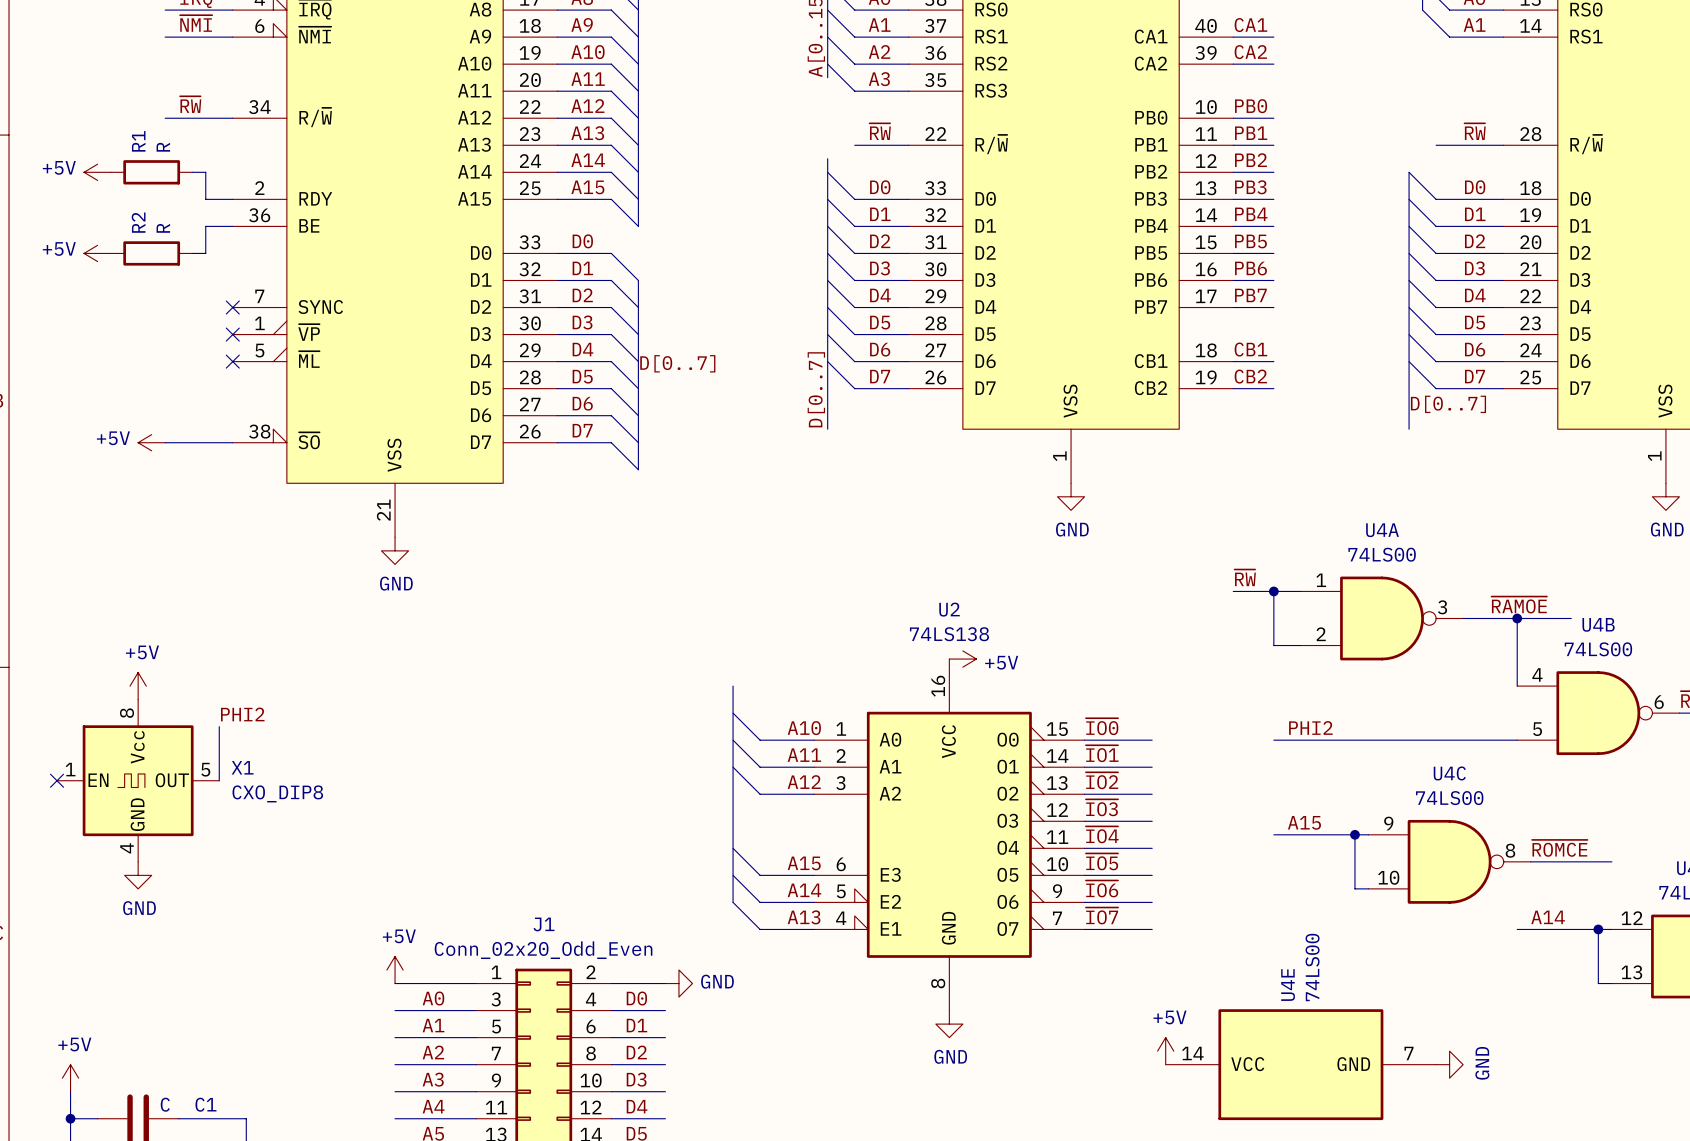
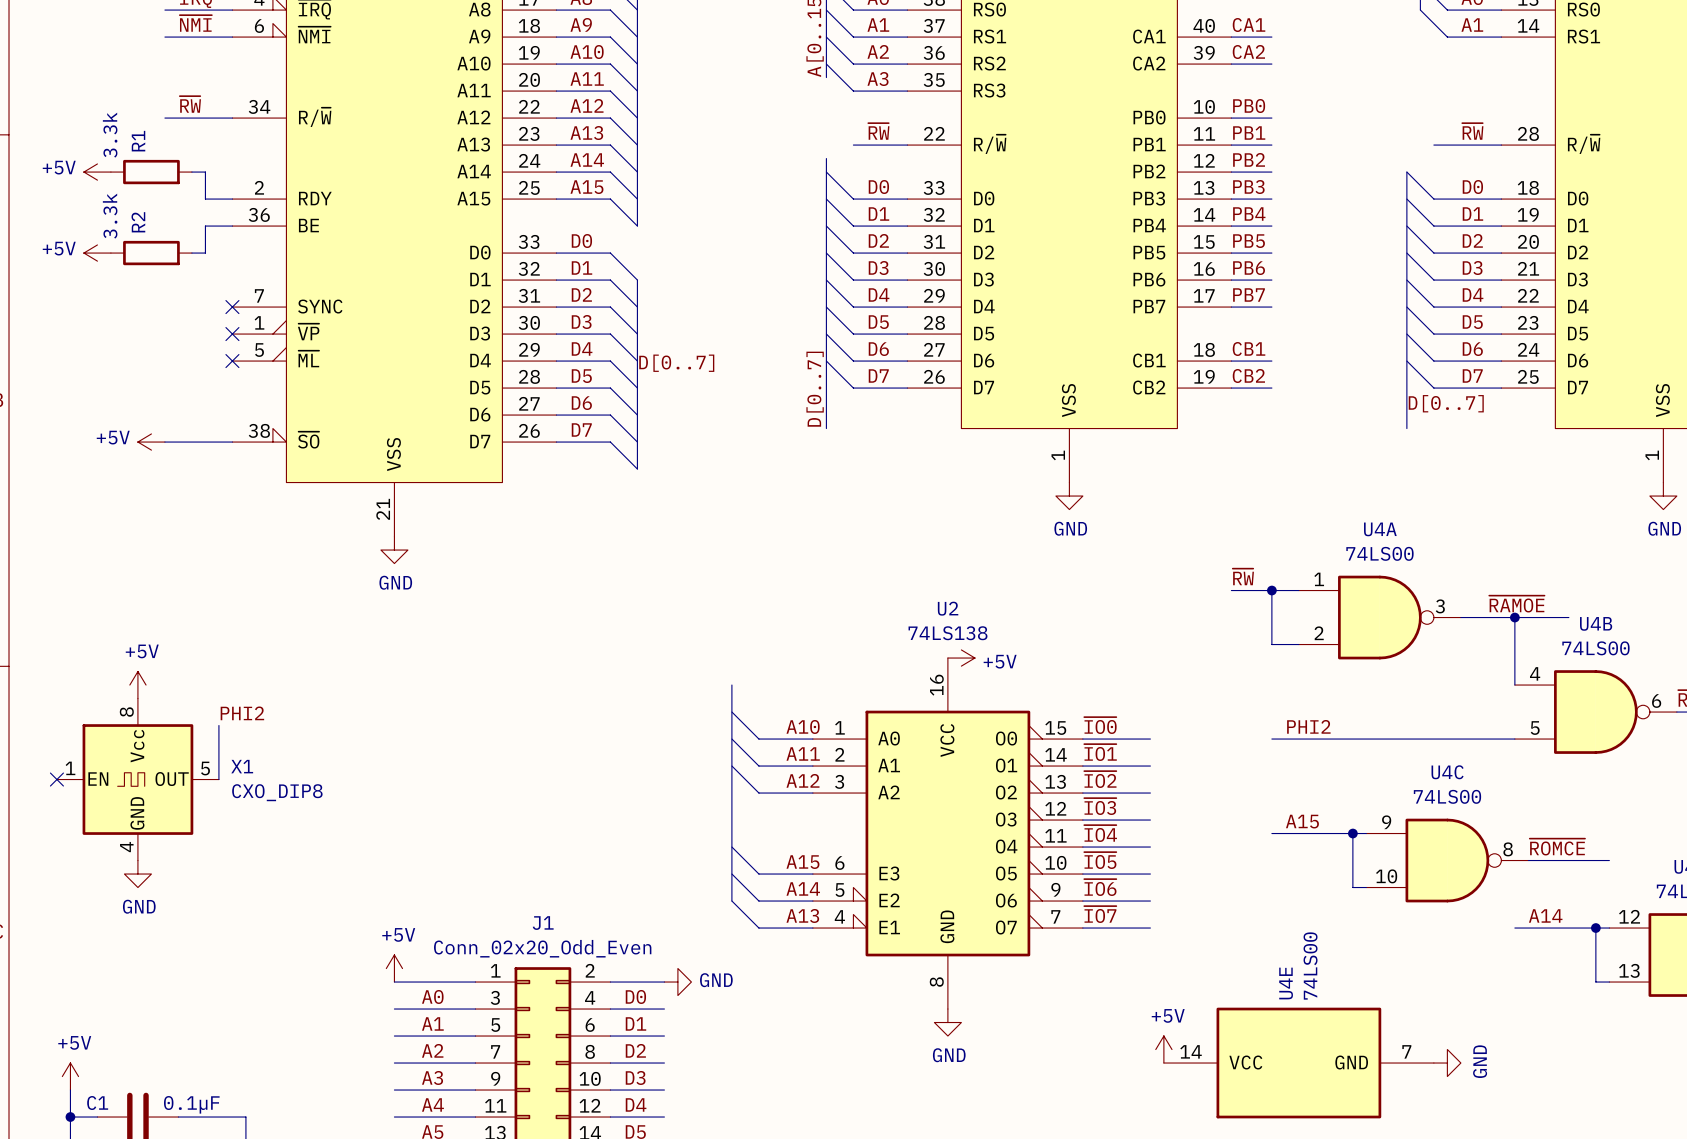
R1 value: R (163, 147) -> 3.3k (110, 135)
R2 value: R (163, 228) -> 3.3k (110, 216)
C1 value: C (165, 1104) -> 0.1µF (191, 1104)
C1 name position: C1 (205, 1104) -> C1 (97, 1103)

